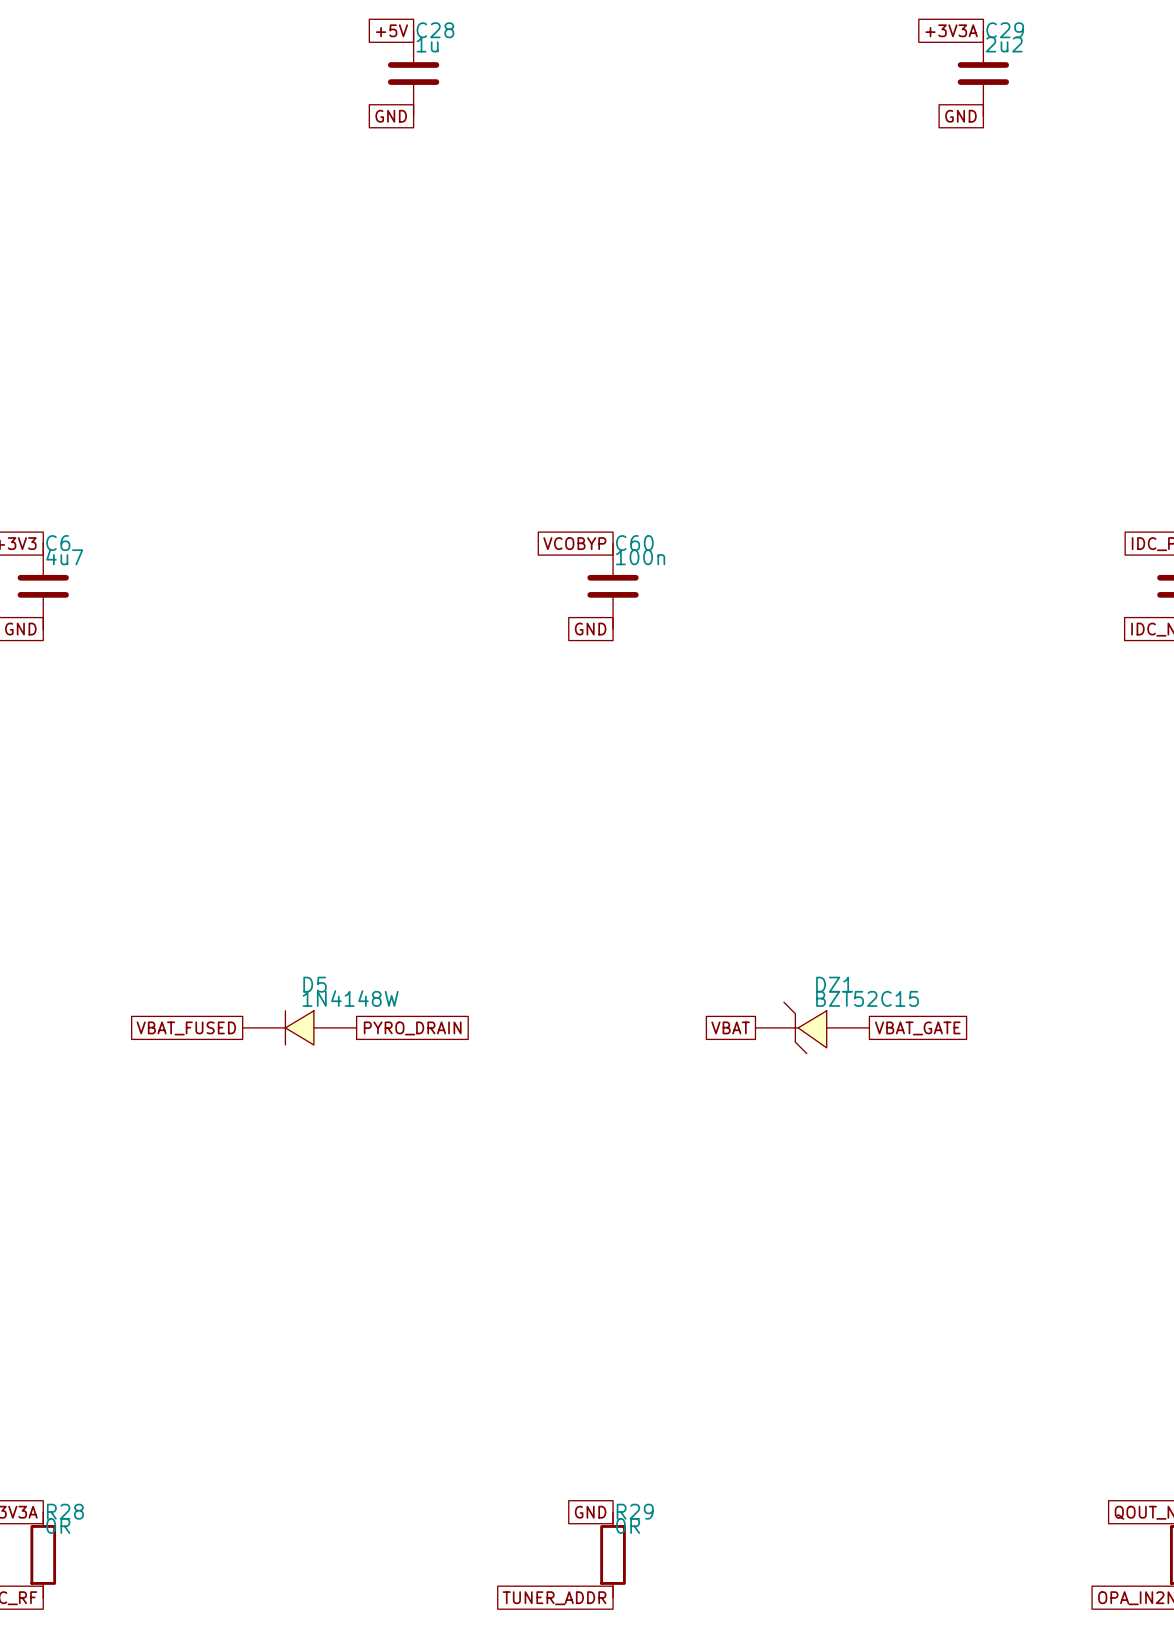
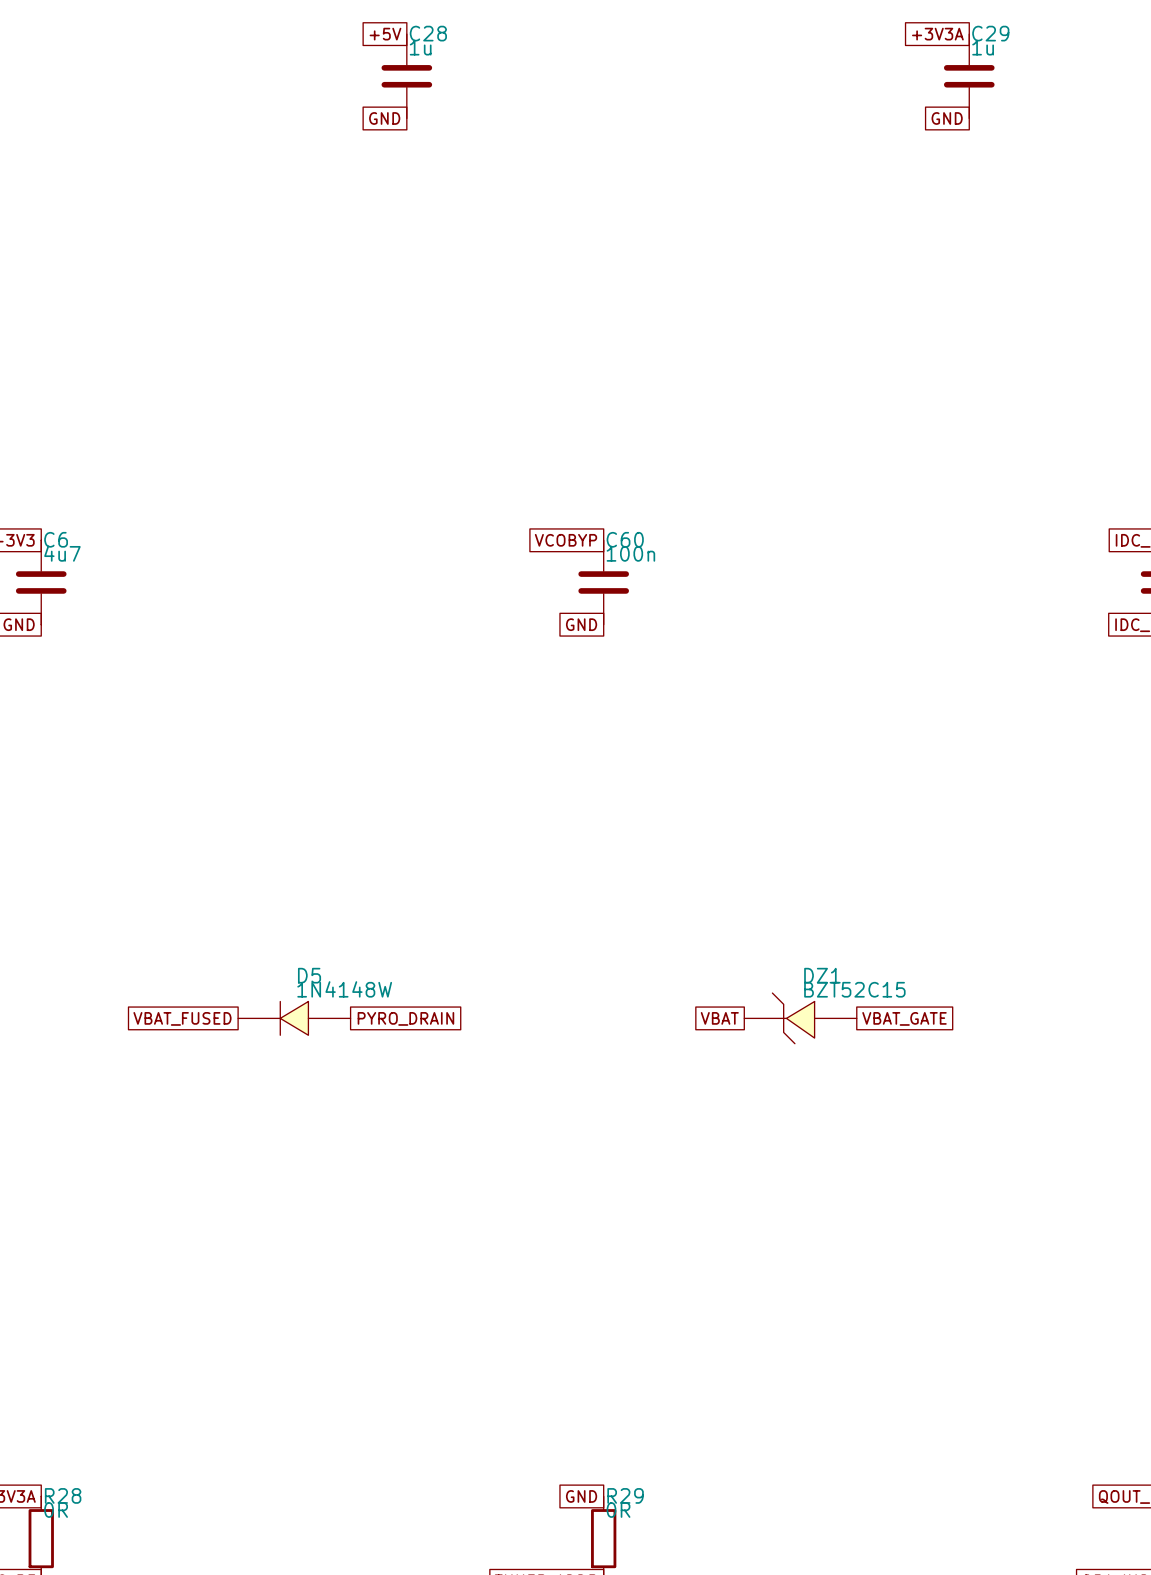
C29 value: 2u2 (1004, 44) -> 1u (983, 47)

